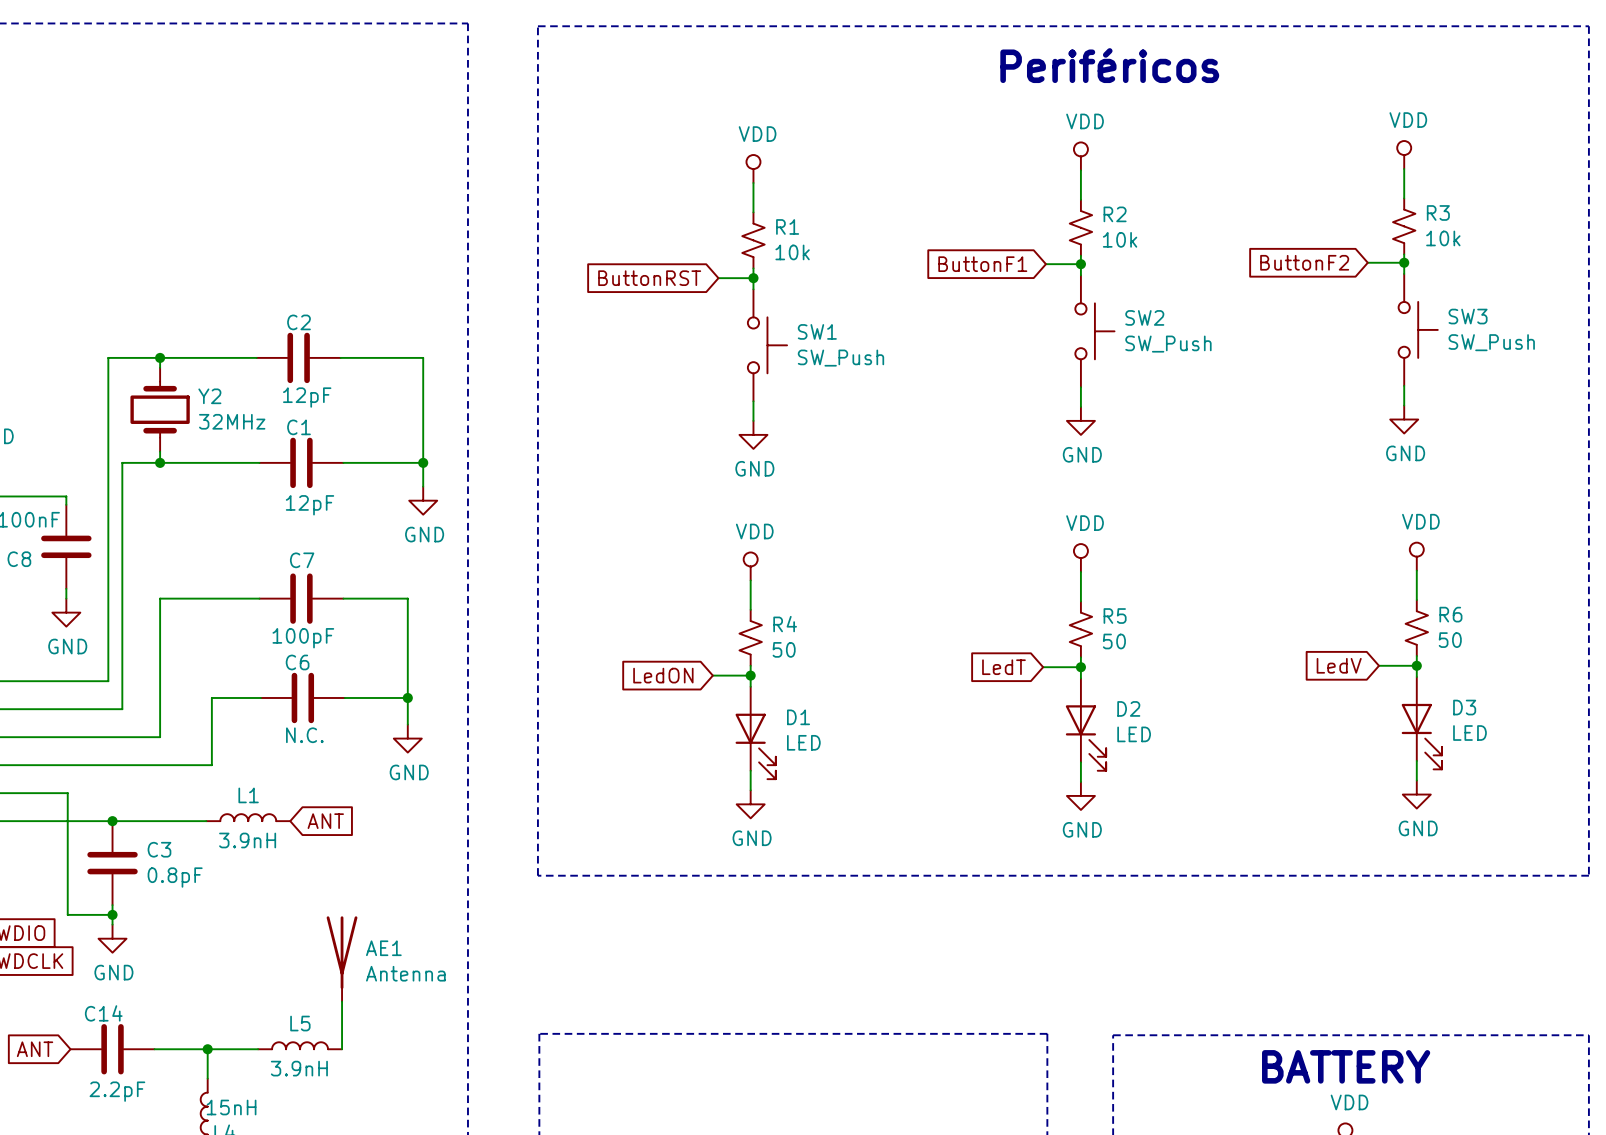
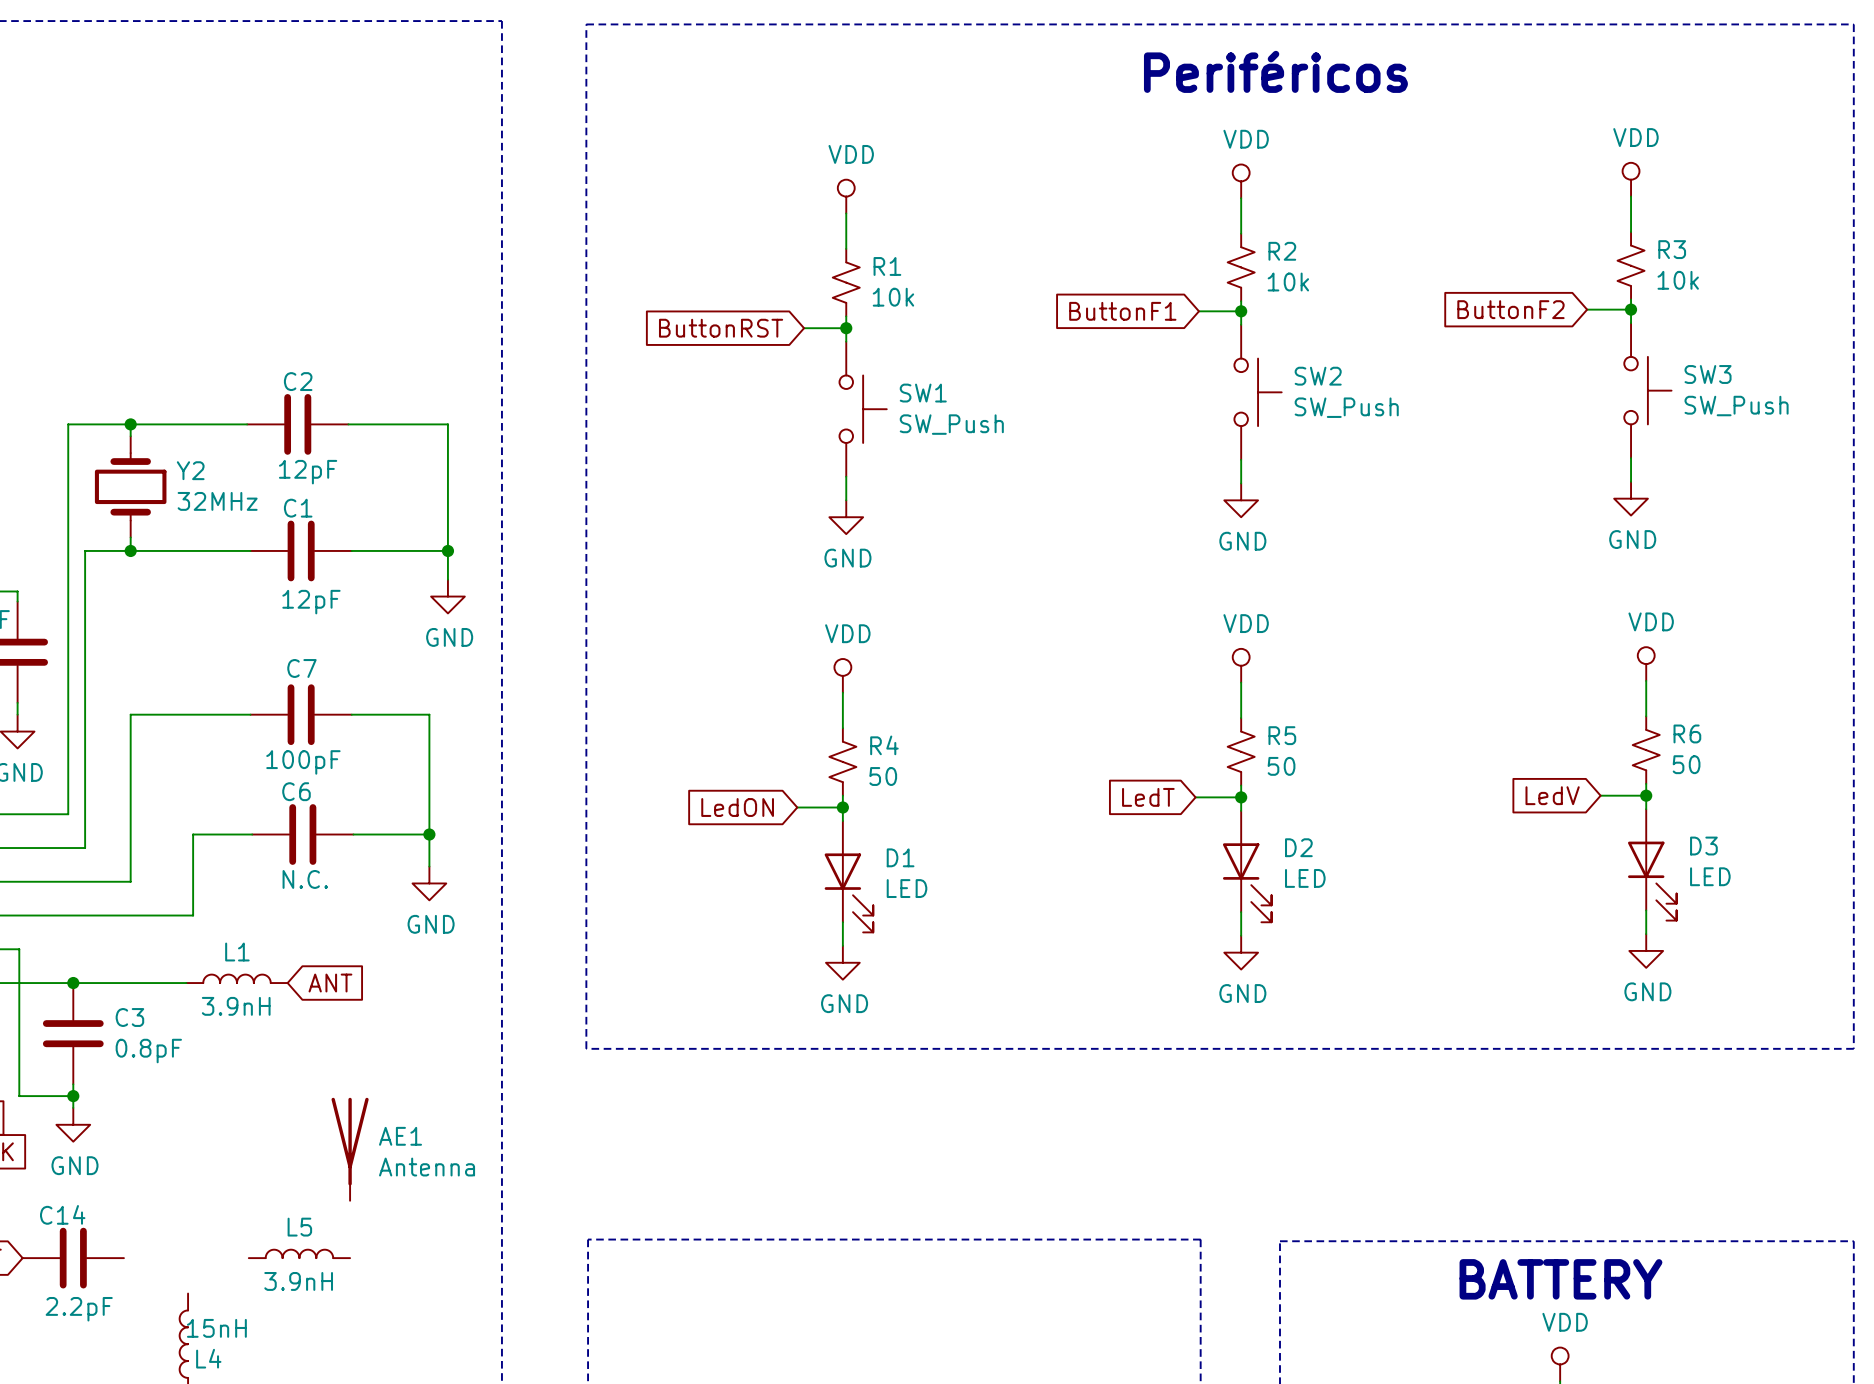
wire: (342, 1001) (342, 1049) -> none
wire: (154, 1049) (258, 1049) -> none
wire: (207, 1049) (207, 1078) -> none
junction: (207, 1049) -> none

